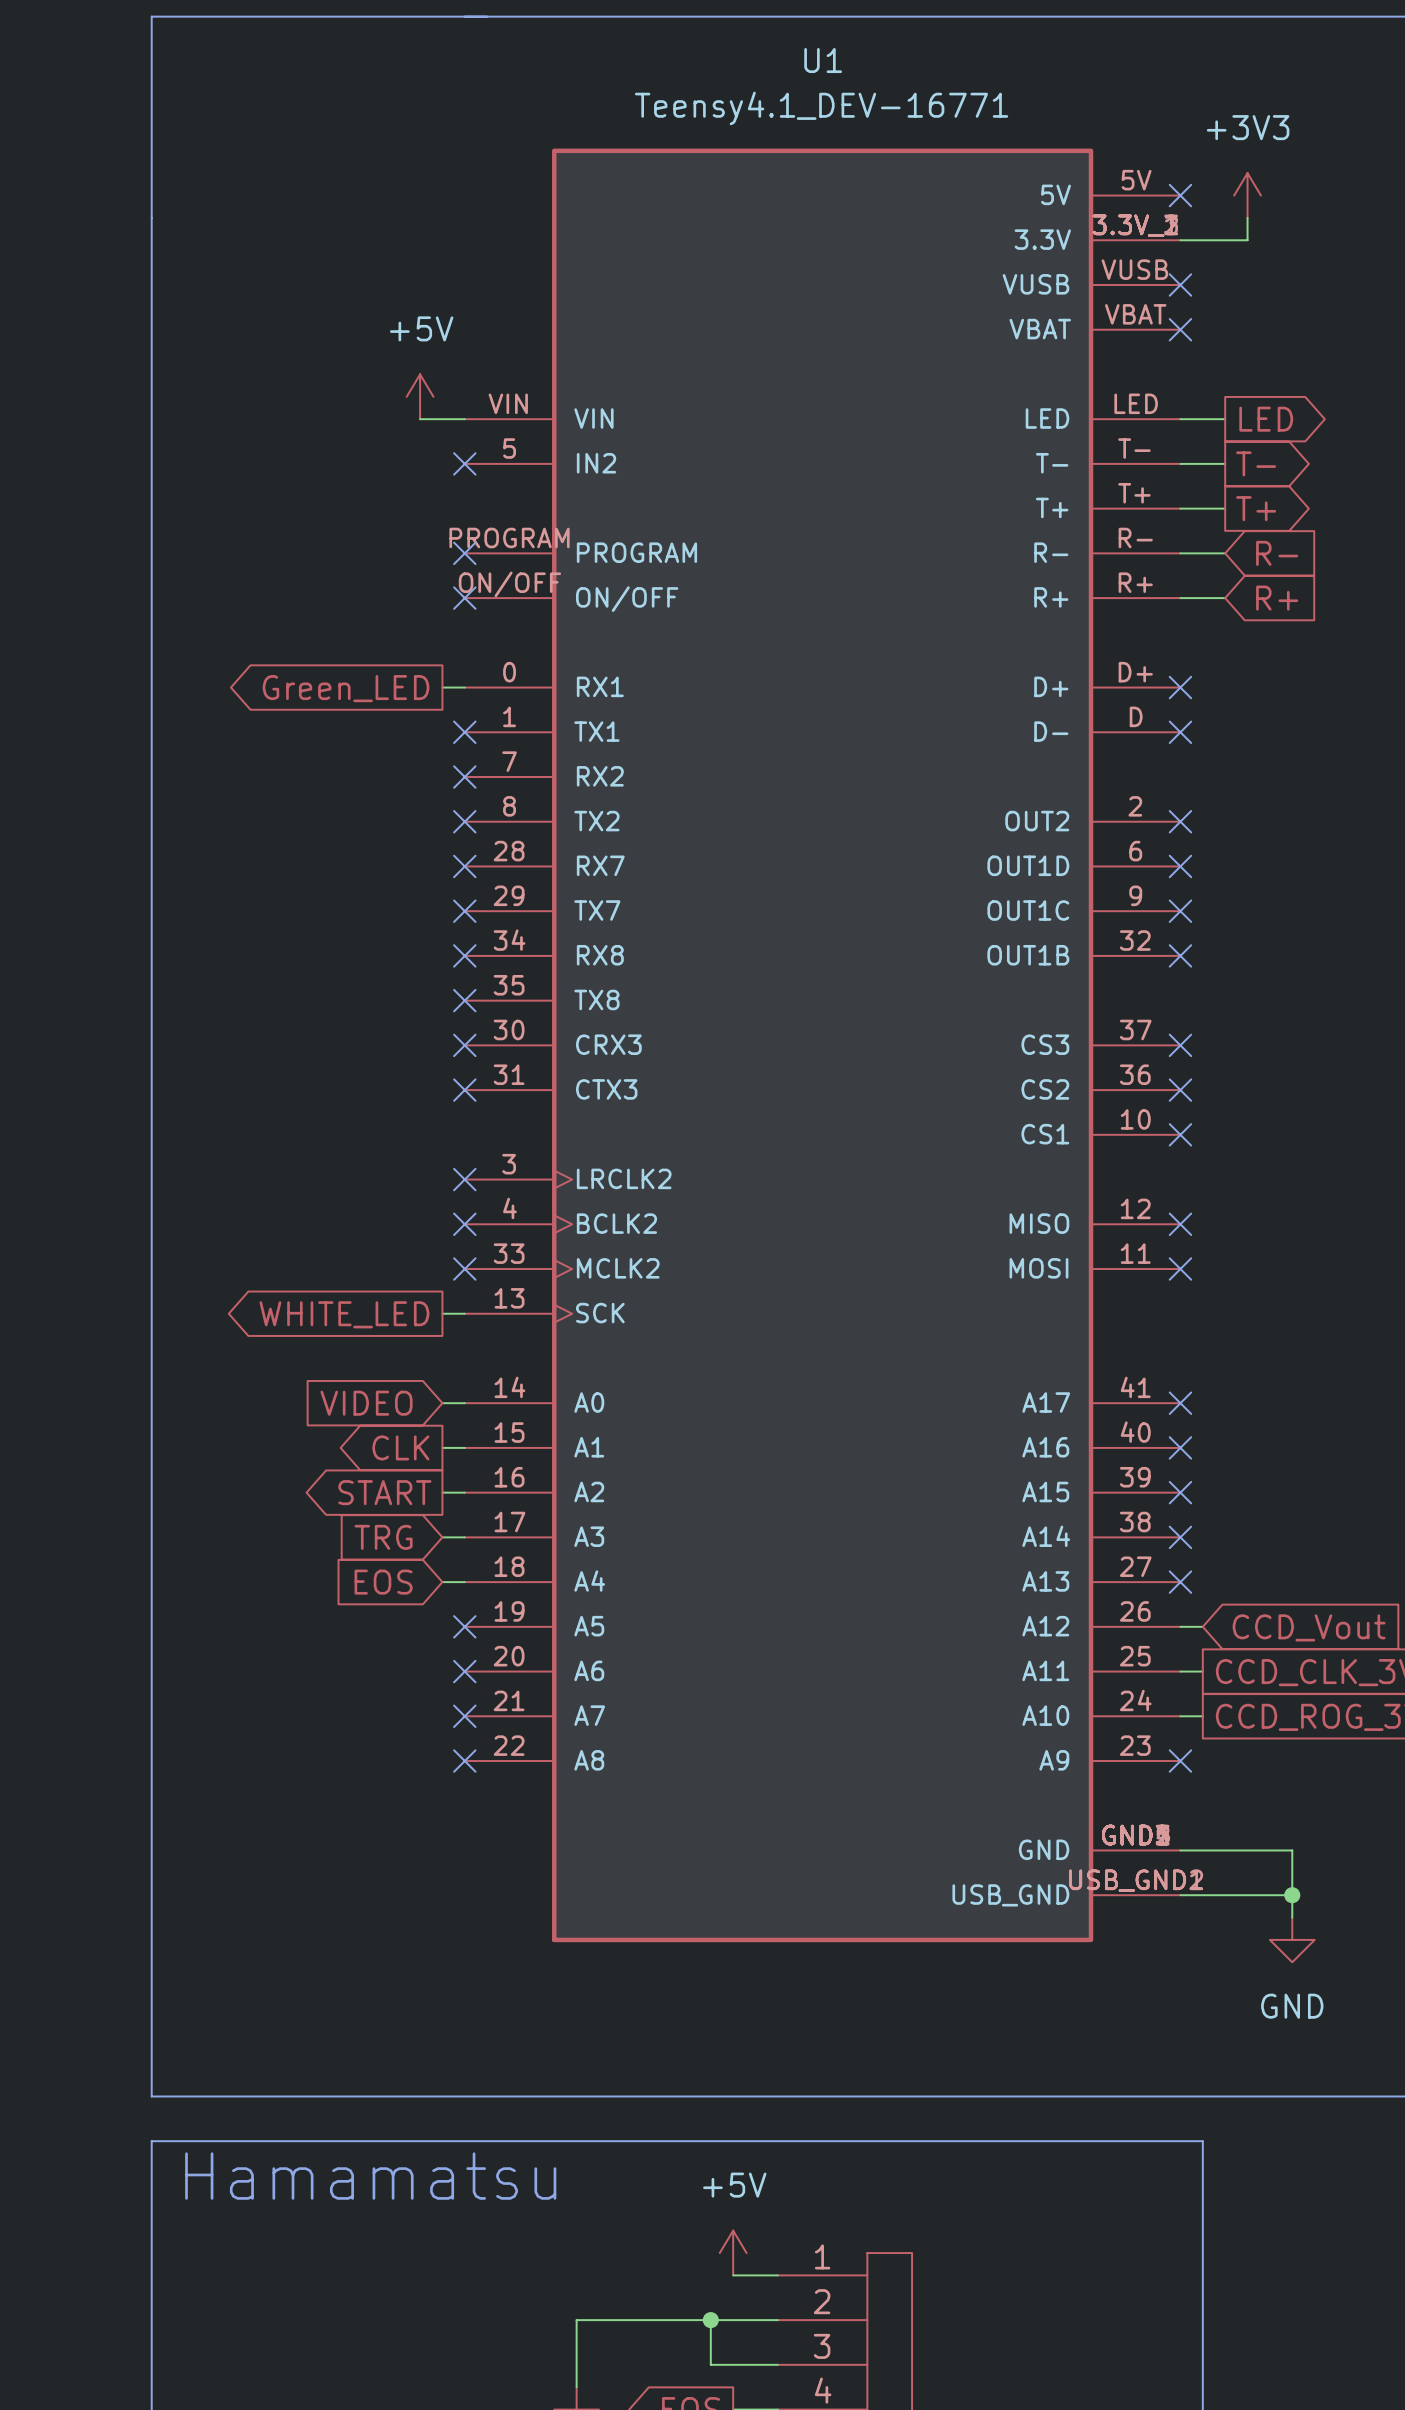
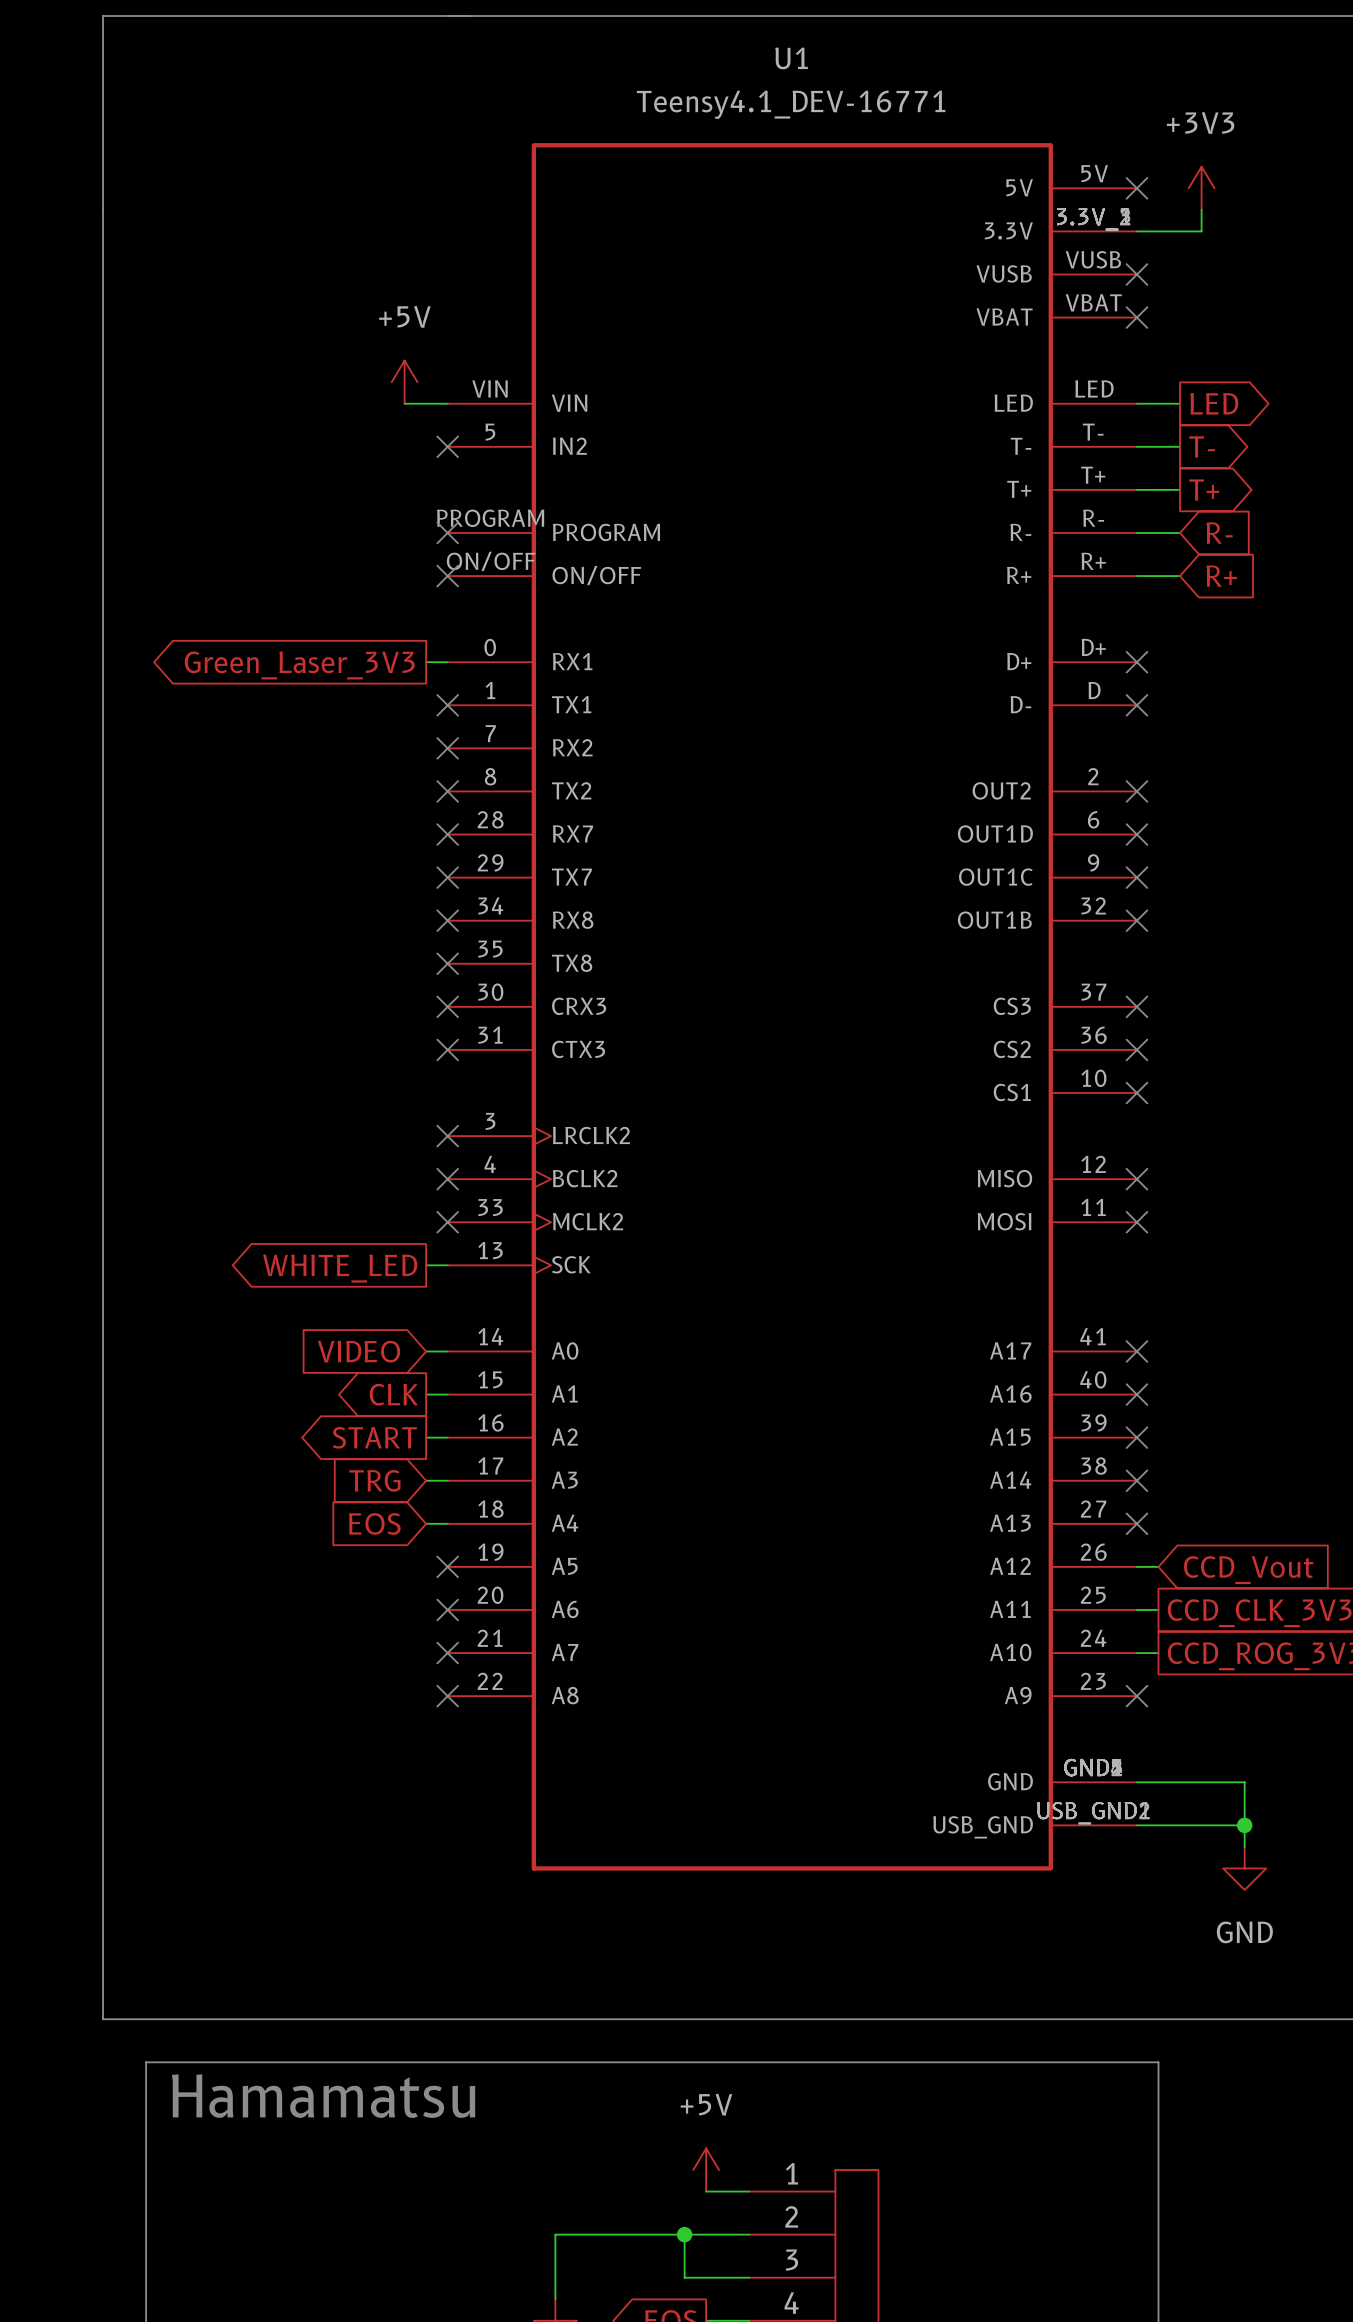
line: (151, 16) (151, 2096) -> (146, 16) (103, 16) (103, 2019) (146, 2019)
global label: Green_LED (346, 688) -> Green_Laser_3V3 (299, 665)

